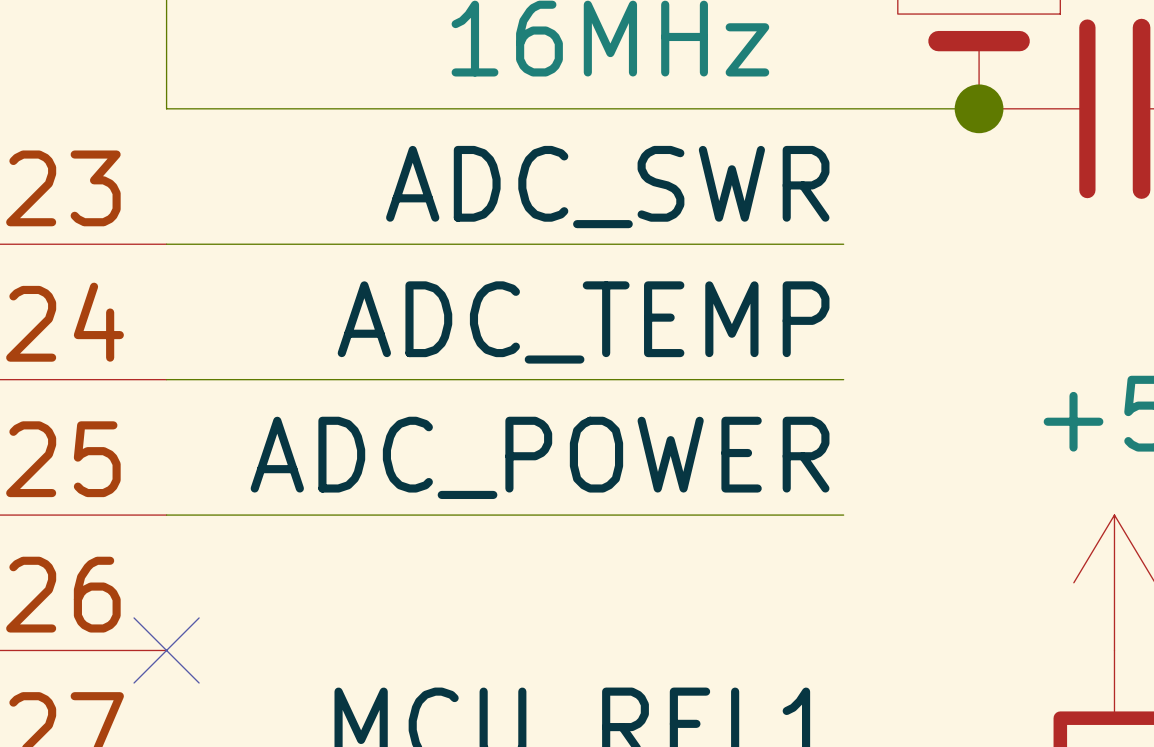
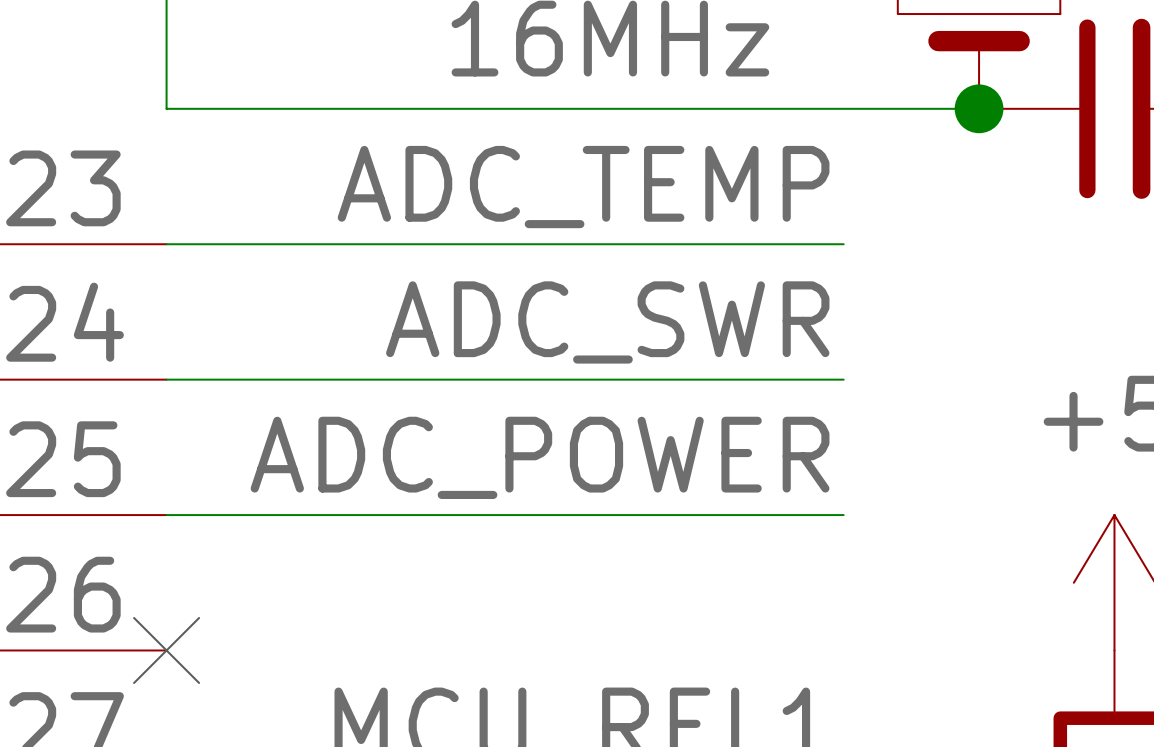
label: ADC_SWR (607, 187) -> ADC_TEMP (583, 187)
label: ADC_TEMP (583, 322) -> ADC_SWR (607, 322)

